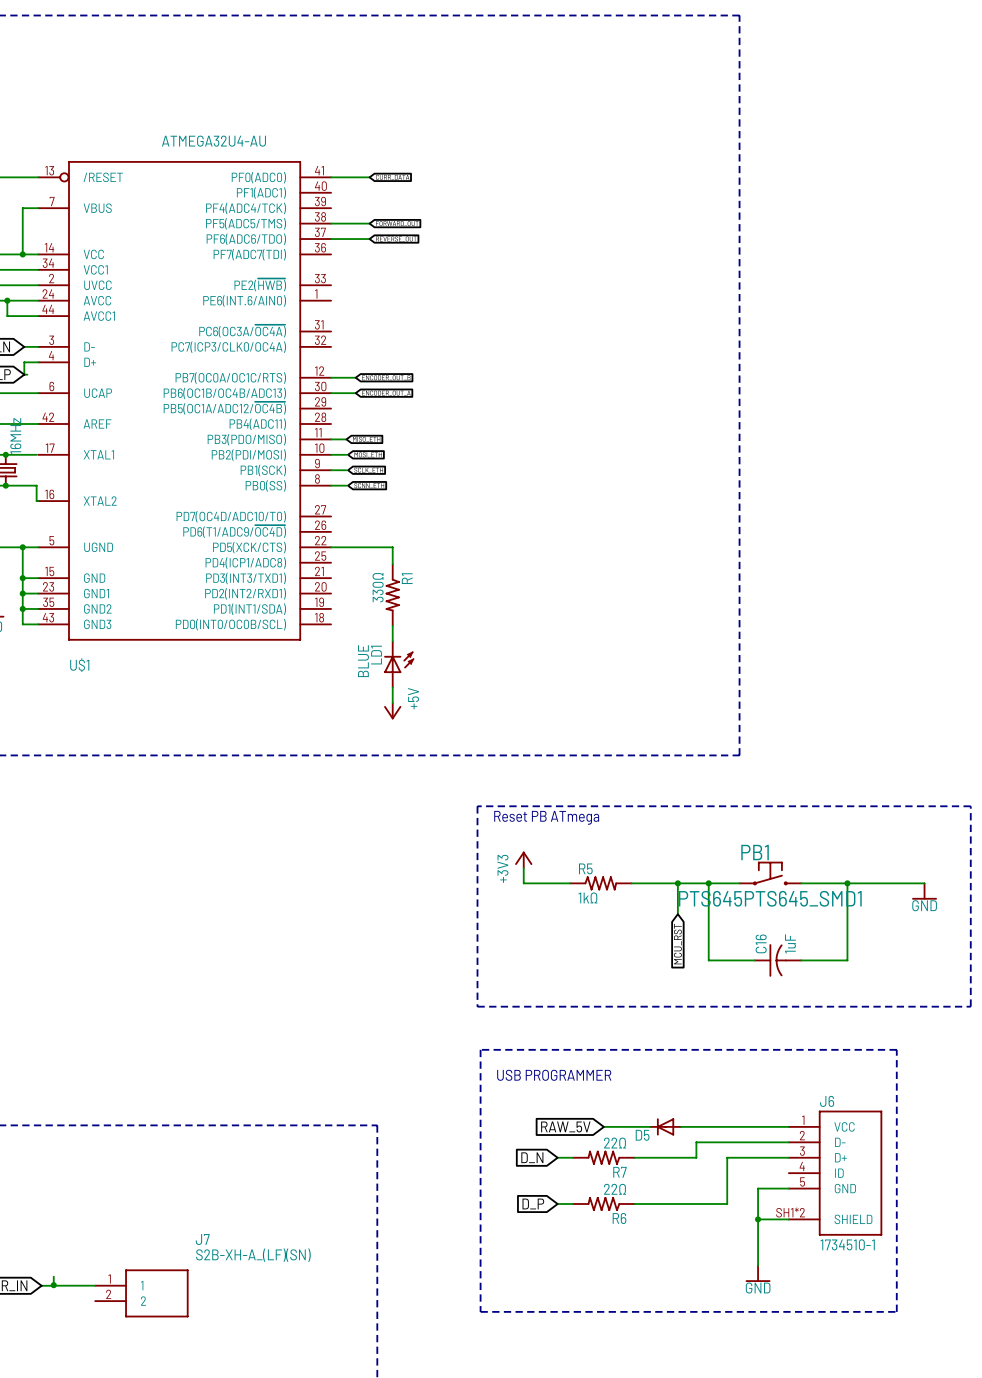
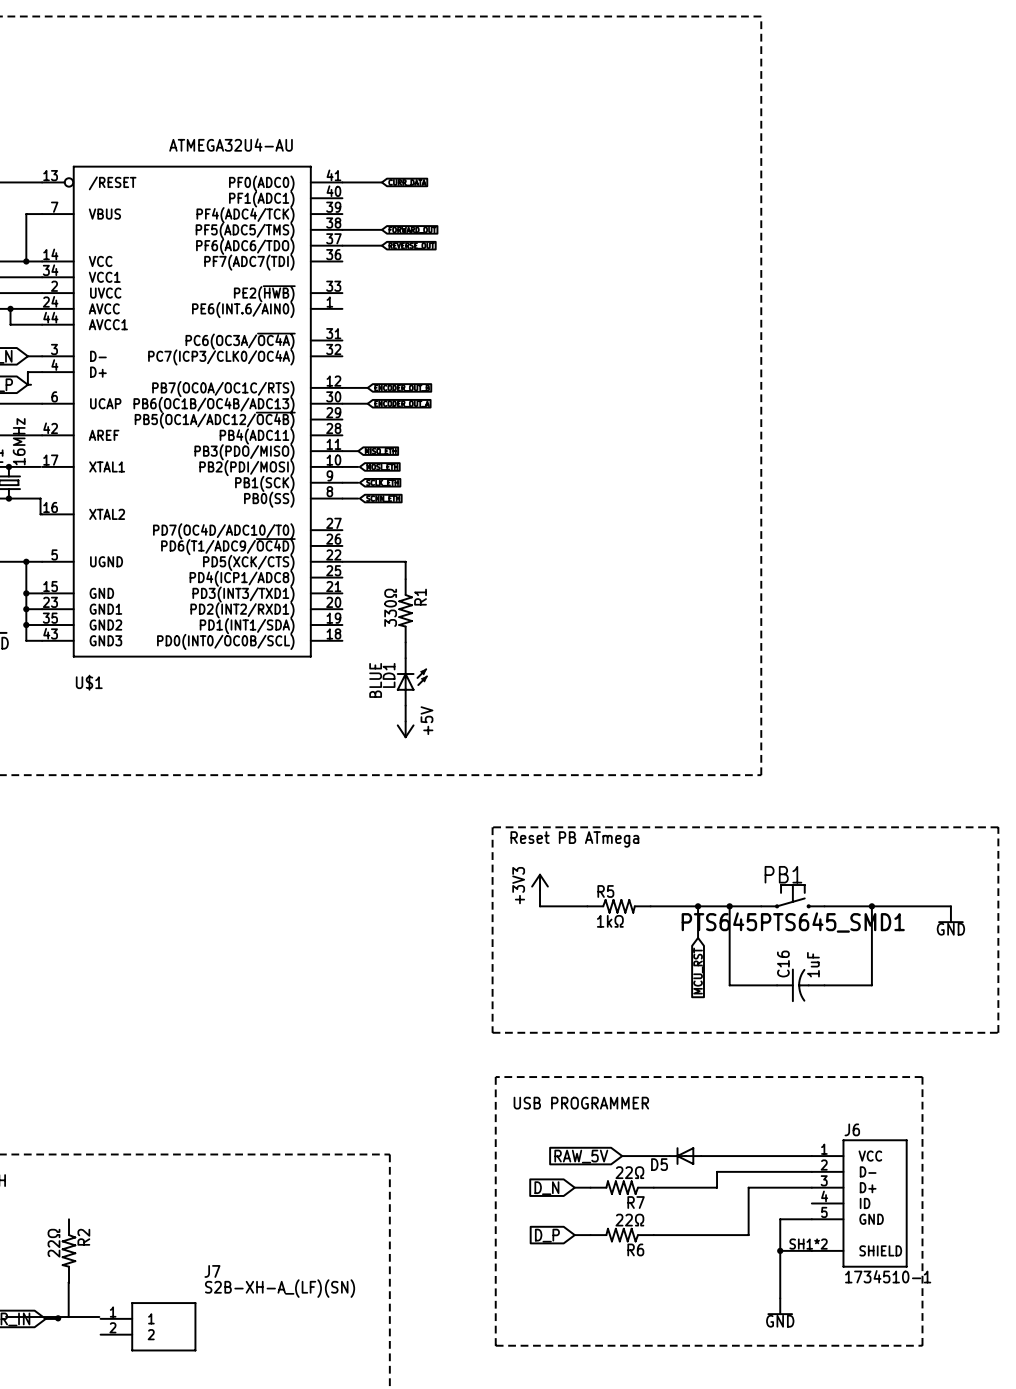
R2: none -> 22Ω (69, 1250)
wire: none -> (69, 1282) (69, 1317)
wire: (53, 1276) (53, 1285) (95, 1285) -> none
wire: none -> (6, 1316) (99, 1317)

